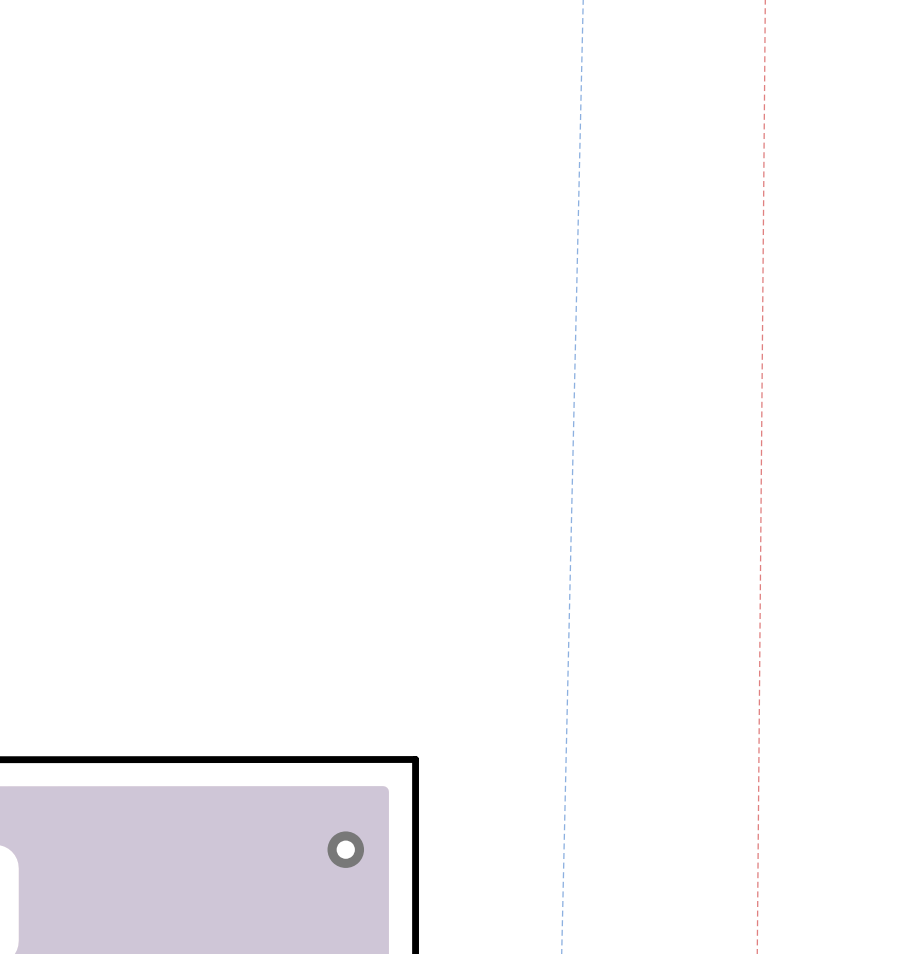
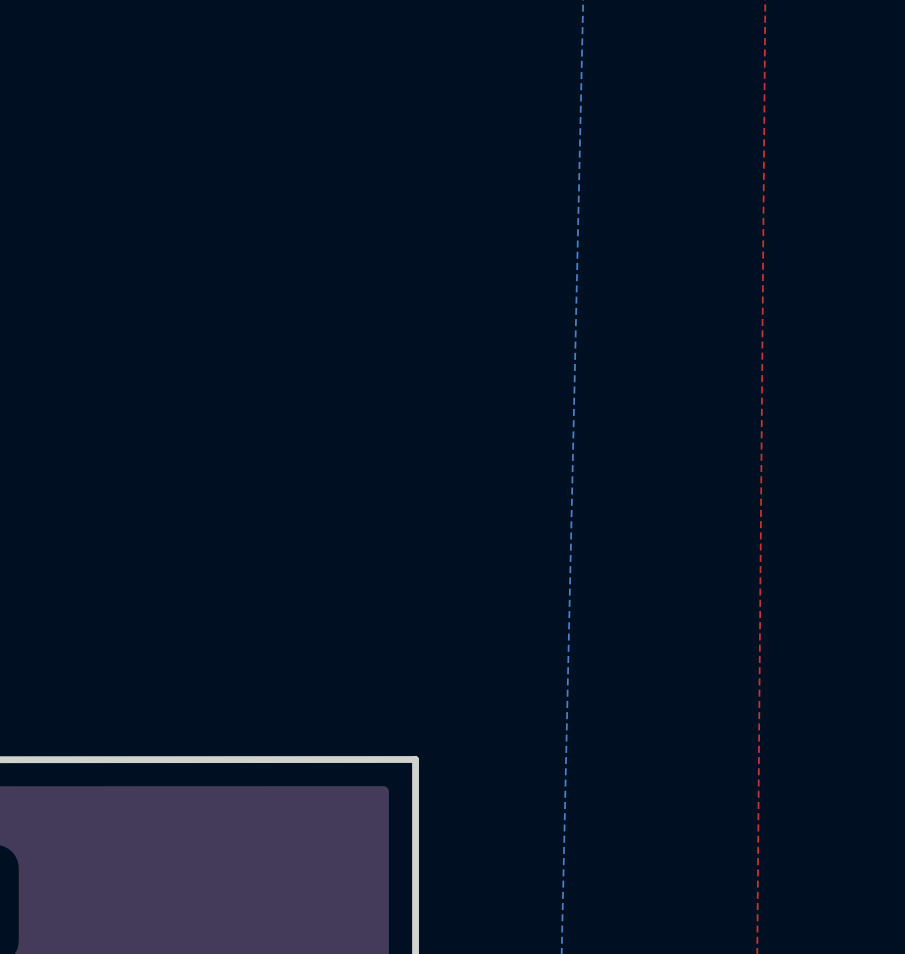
via: (345, 849) -> none

